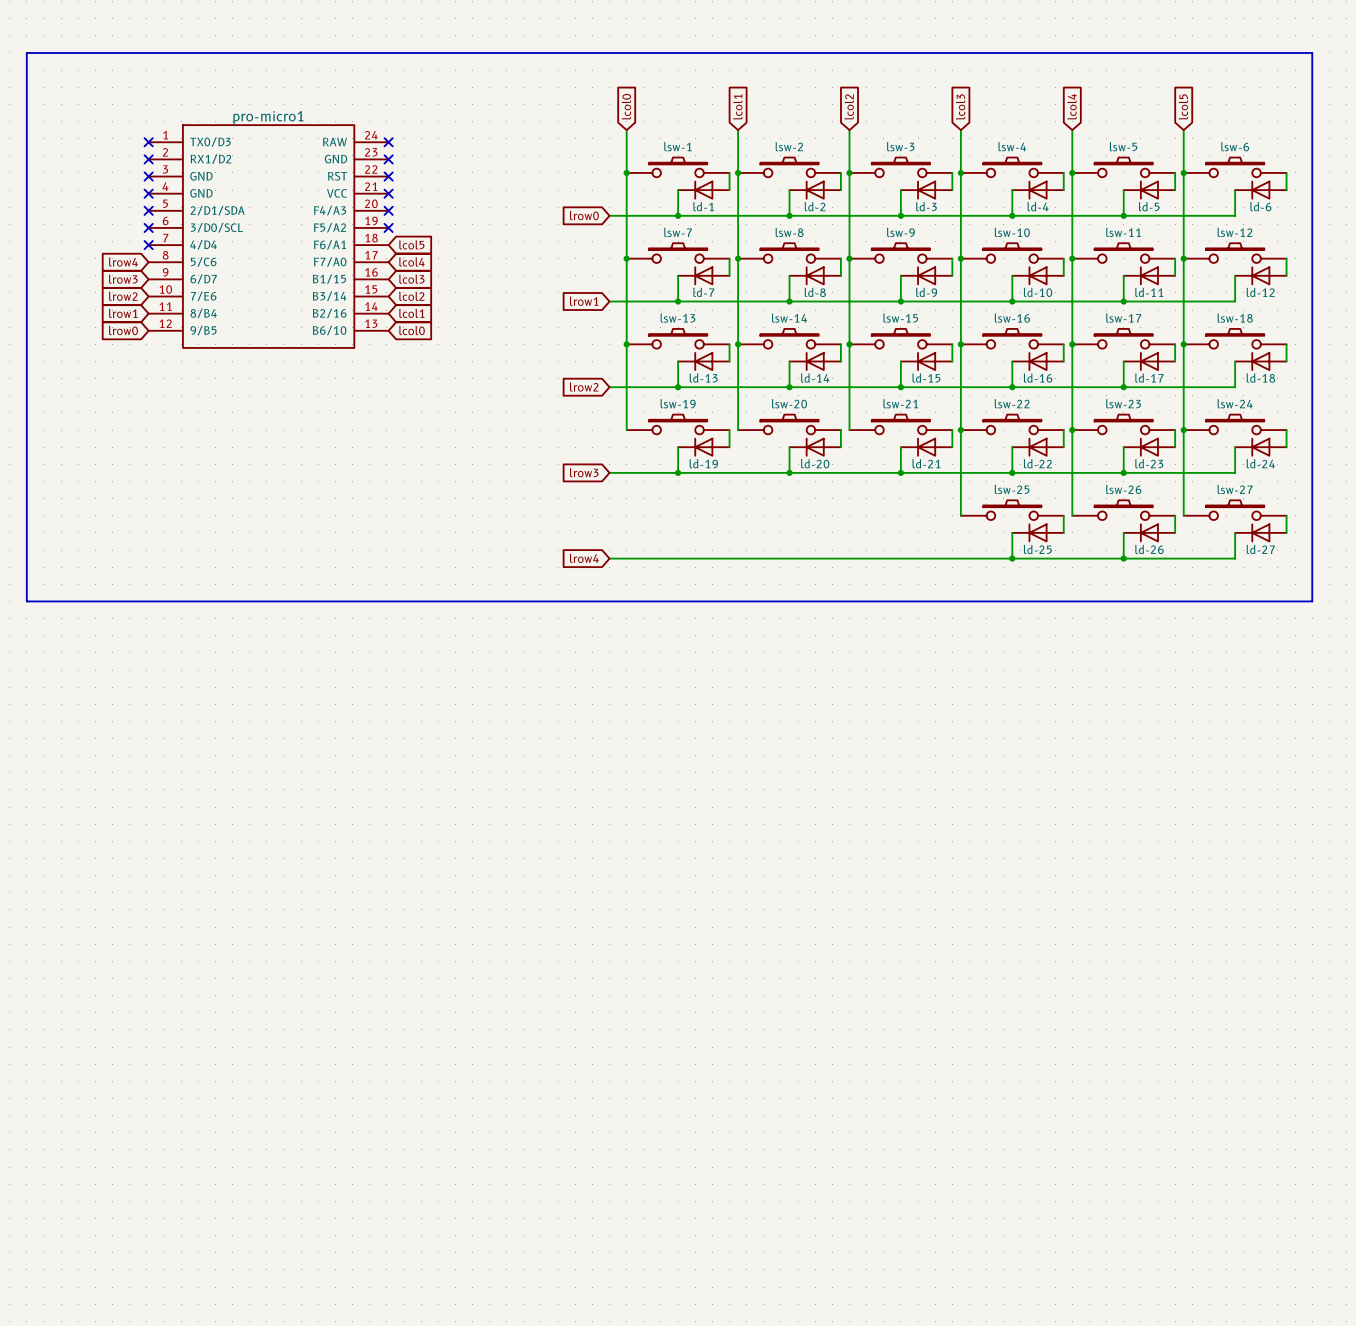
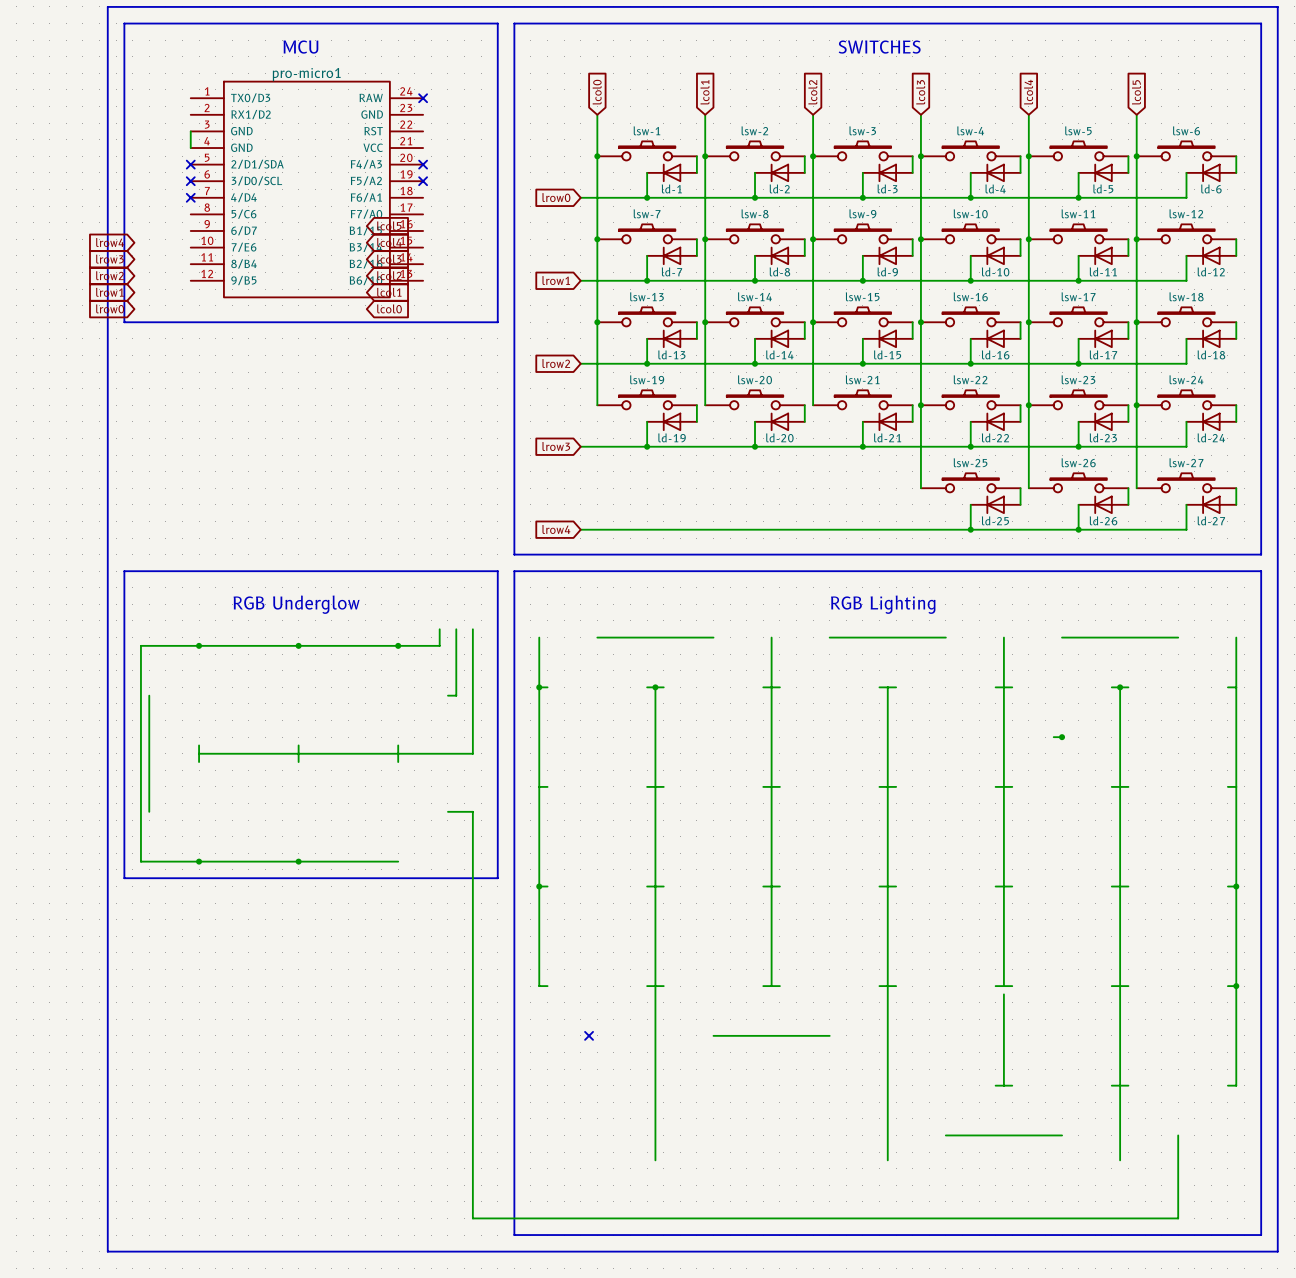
line: none -> (107, 6) (107, 1251) (1277, 1251) (1277, 6) (107, 6)
line: none -> (124, 23) (497, 23) (497, 322) (124, 322) (124, 23)
line: (1312, 52) (26, 52) (26, 601) (138, 601) -> none
text: none -> MCU (300, 47)
text: none -> SWITCHES (879, 47)
no-connect mark: none -> (423, 98)
no-connect mark: (148, 142) -> none
no-connect mark: (388, 142) -> none
wire: none -> (190, 131) (190, 148)
no-connect mark: (148, 159) -> none
no-connect mark: (388, 159) -> none
no-connect mark: (148, 176) -> none
no-connect mark: (388, 176) -> none
no-connect mark: none -> (190, 164)
no-connect mark: none -> (423, 164)
no-connect mark: (148, 193) -> none
no-connect mark: (388, 193) -> none
no-connect mark: none -> (190, 181)
no-connect mark: none -> (423, 181)
no-connect mark: (148, 210) -> none
no-connect mark: (388, 210) -> none
no-connect mark: none -> (190, 197)
no-connect mark: (148, 227) -> none
no-connect mark: (388, 227) -> none
pro-micro1 position: (268, 236) -> (306, 189)
no-connect mark: (148, 245) -> none
line: (1312, 584) (1312, 601) -> (1261, 554) (514, 554) (514, 23) (1261, 23) (1261, 40)
line: (523, 601) (540, 601) -> (497, 571) (497, 878) (124, 878) (124, 571)
line: none -> (514, 571) (514, 1235) (1261, 1235) (1261, 571)
text: none -> RGB Underglow (296, 604)
text: none -> RGB Lighting (883, 604)
wire: none -> (439, 629) (439, 645) (140, 645) (140, 861) (398, 861)
wire: none -> (456, 629) (456, 695) (447, 695)
wire: none -> (472, 629) (472, 753) (199, 753)
wire: none -> (539, 637) (539, 986) (547, 986)
wire: none -> (597, 637) (713, 637)
wire: none -> (771, 637) (771, 986)
wire: none -> (829, 637) (945, 637)
wire: none -> (1003, 637) (1003, 986)
wire: none -> (1062, 637) (1178, 637)
wire: none -> (1236, 637) (1236, 1085) (1227, 1085)
junction: none -> (199, 645)
junction: none -> (298, 645)
junction: none -> (398, 645)
wire: none -> (539, 687) (547, 687)
junction: none -> (539, 687)
wire: none -> (647, 687) (663, 687)
wire: none -> (655, 687) (655, 1160)
junction: none -> (655, 687)
wire: none -> (763, 687) (779, 687)
wire: none -> (879, 687) (896, 687)
wire: none -> (887, 687) (887, 1160)
wire: none -> (995, 687) (1012, 687)
wire: none -> (1111, 687) (1128, 687)
wire: none -> (1120, 687) (1120, 1160)
junction: none -> (1120, 687)
wire: none -> (1227, 687) (1236, 687)
wire: none -> (149, 695) (149, 811)
wire: none -> (1053, 737) (1062, 737)
junction: none -> (1062, 737)
wire: none -> (199, 745) (199, 762)
wire: none -> (298, 745) (298, 762)
wire: none -> (398, 745) (398, 762)
wire: none -> (539, 786) (547, 786)
wire: none -> (647, 786) (663, 786)
wire: none -> (763, 786) (779, 786)
wire: none -> (879, 786) (896, 786)
wire: none -> (995, 786) (1012, 786)
wire: none -> (1111, 786) (1128, 786)
wire: none -> (1227, 786) (1236, 786)
wire: none -> (447, 811) (472, 811) (472, 1218) (1178, 1218) (1178, 1135)
junction: none -> (199, 861)
junction: none -> (298, 861)
wire: none -> (539, 886) (547, 886)
junction: none -> (539, 886)
wire: none -> (647, 886) (663, 886)
wire: none -> (763, 886) (779, 886)
wire: none -> (879, 886) (896, 886)
wire: none -> (995, 886) (1012, 886)
wire: none -> (1111, 886) (1128, 886)
wire: none -> (1227, 886) (1236, 886)
junction: none -> (1236, 886)
wire: none -> (647, 986) (663, 986)
wire: none -> (763, 986) (779, 986)
wire: none -> (879, 986) (896, 986)
wire: none -> (995, 986) (1012, 986)
wire: none -> (1111, 986) (1128, 986)
wire: none -> (1227, 986) (1236, 986)
junction: none -> (1236, 986)
wire: none -> (1003, 994) (1003, 1085)
no-connect mark: none -> (589, 1035)
wire: none -> (713, 1035) (829, 1035)
wire: none -> (995, 1085) (1012, 1085)
wire: none -> (1111, 1085) (1128, 1085)
wire: none -> (945, 1135) (1062, 1135)

